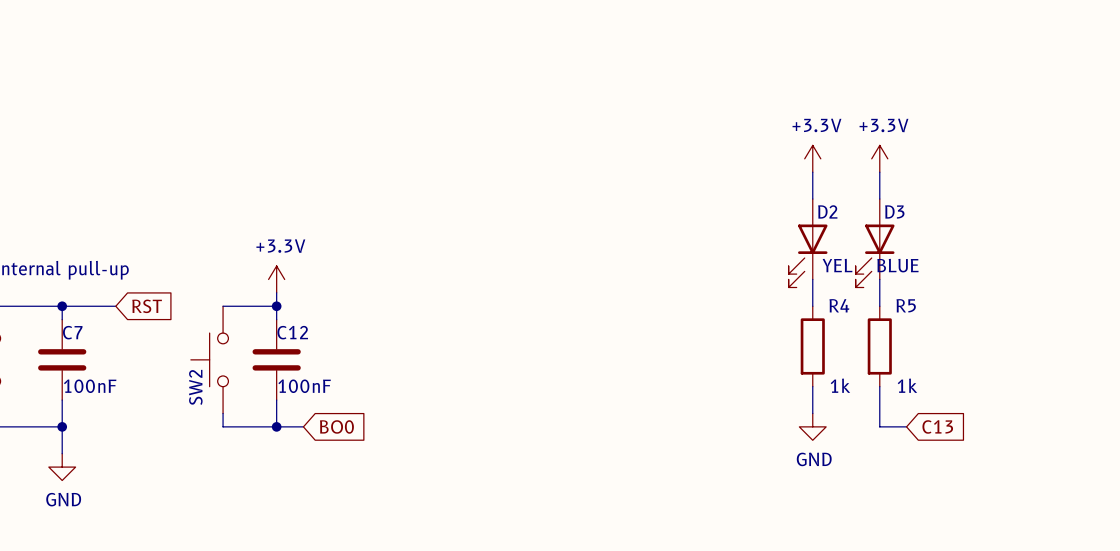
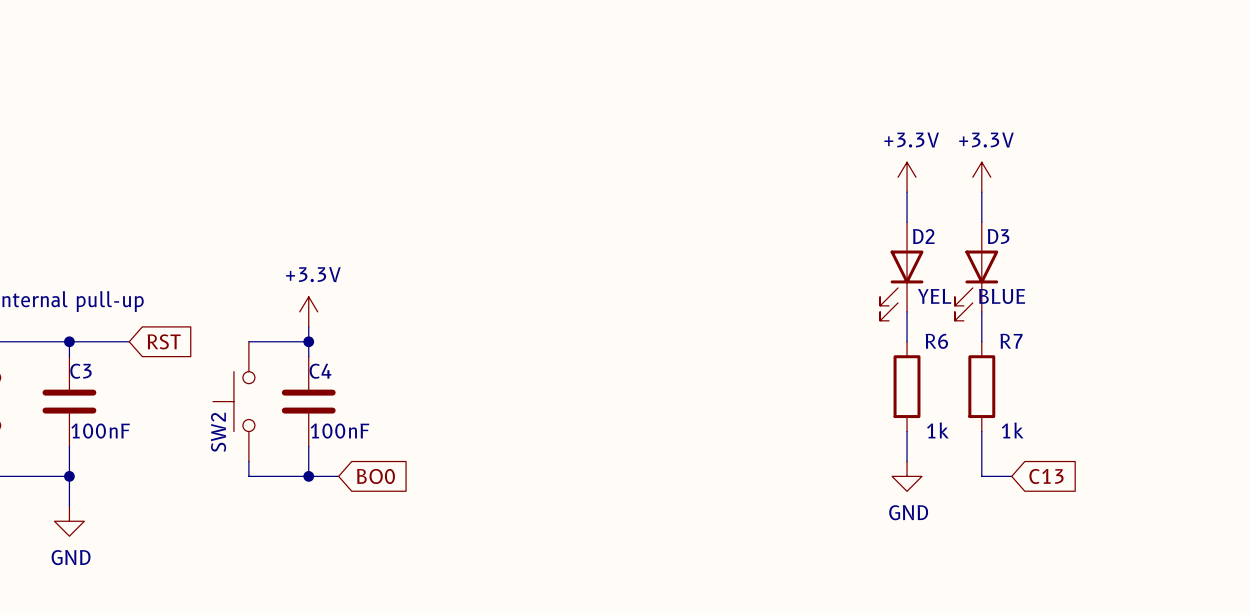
R4 name: R4 (839, 305) -> R6 (936, 341)
R5 name: R5 (906, 305) -> R7 (1011, 341)
C7 name: C7 (72, 332) -> C3 (80, 371)
C12 name: C12 (292, 332) -> C4 (320, 371)

